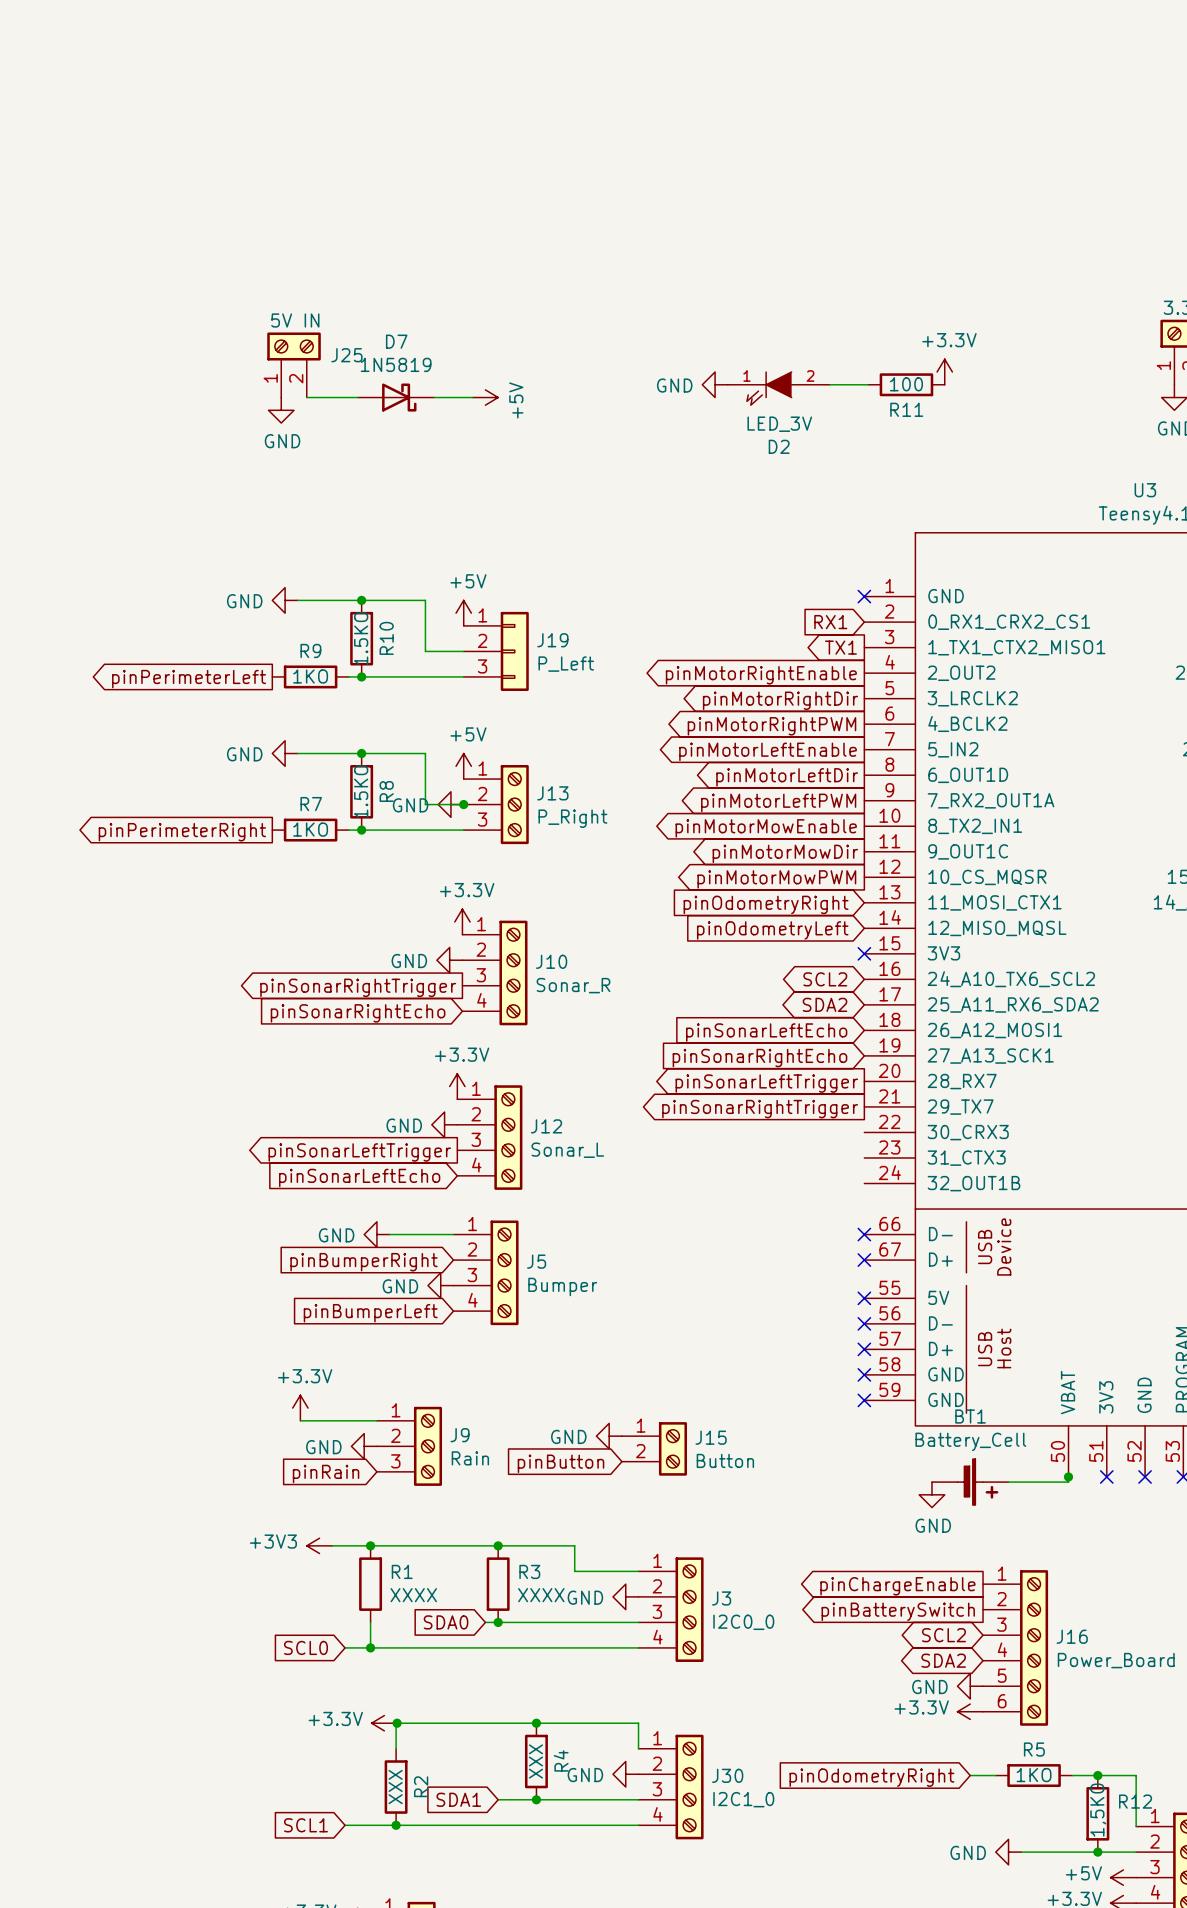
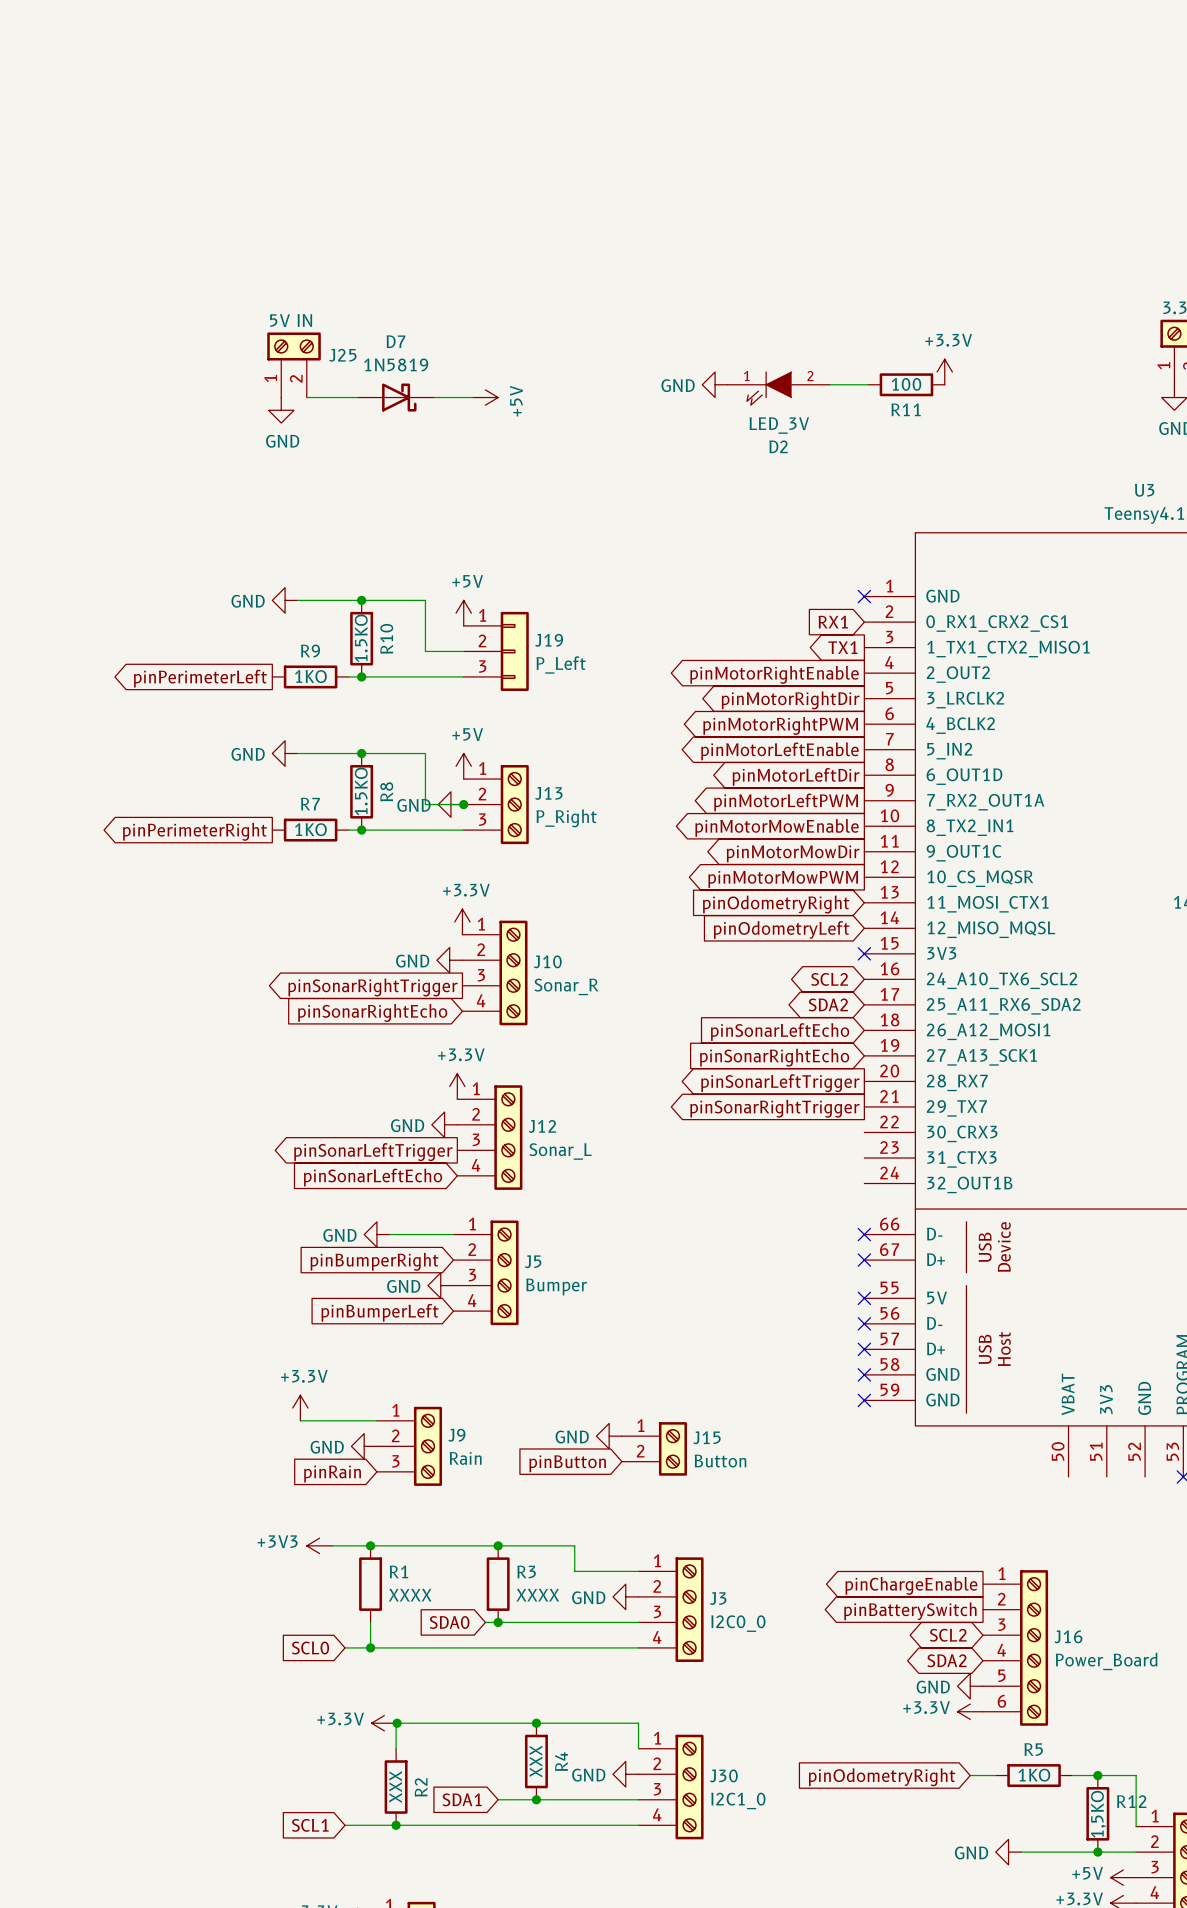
wire: (1068, 1473) (1068, 1482) (1008, 1482) -> none
junction: (1068, 1476) -> none
no-connect mark: (1106, 1476) -> none
no-connect mark: (1145, 1476) -> none
BT1: Battery_Cell (970, 1482) -> none
power symbol: GND (931, 1494) -> none

